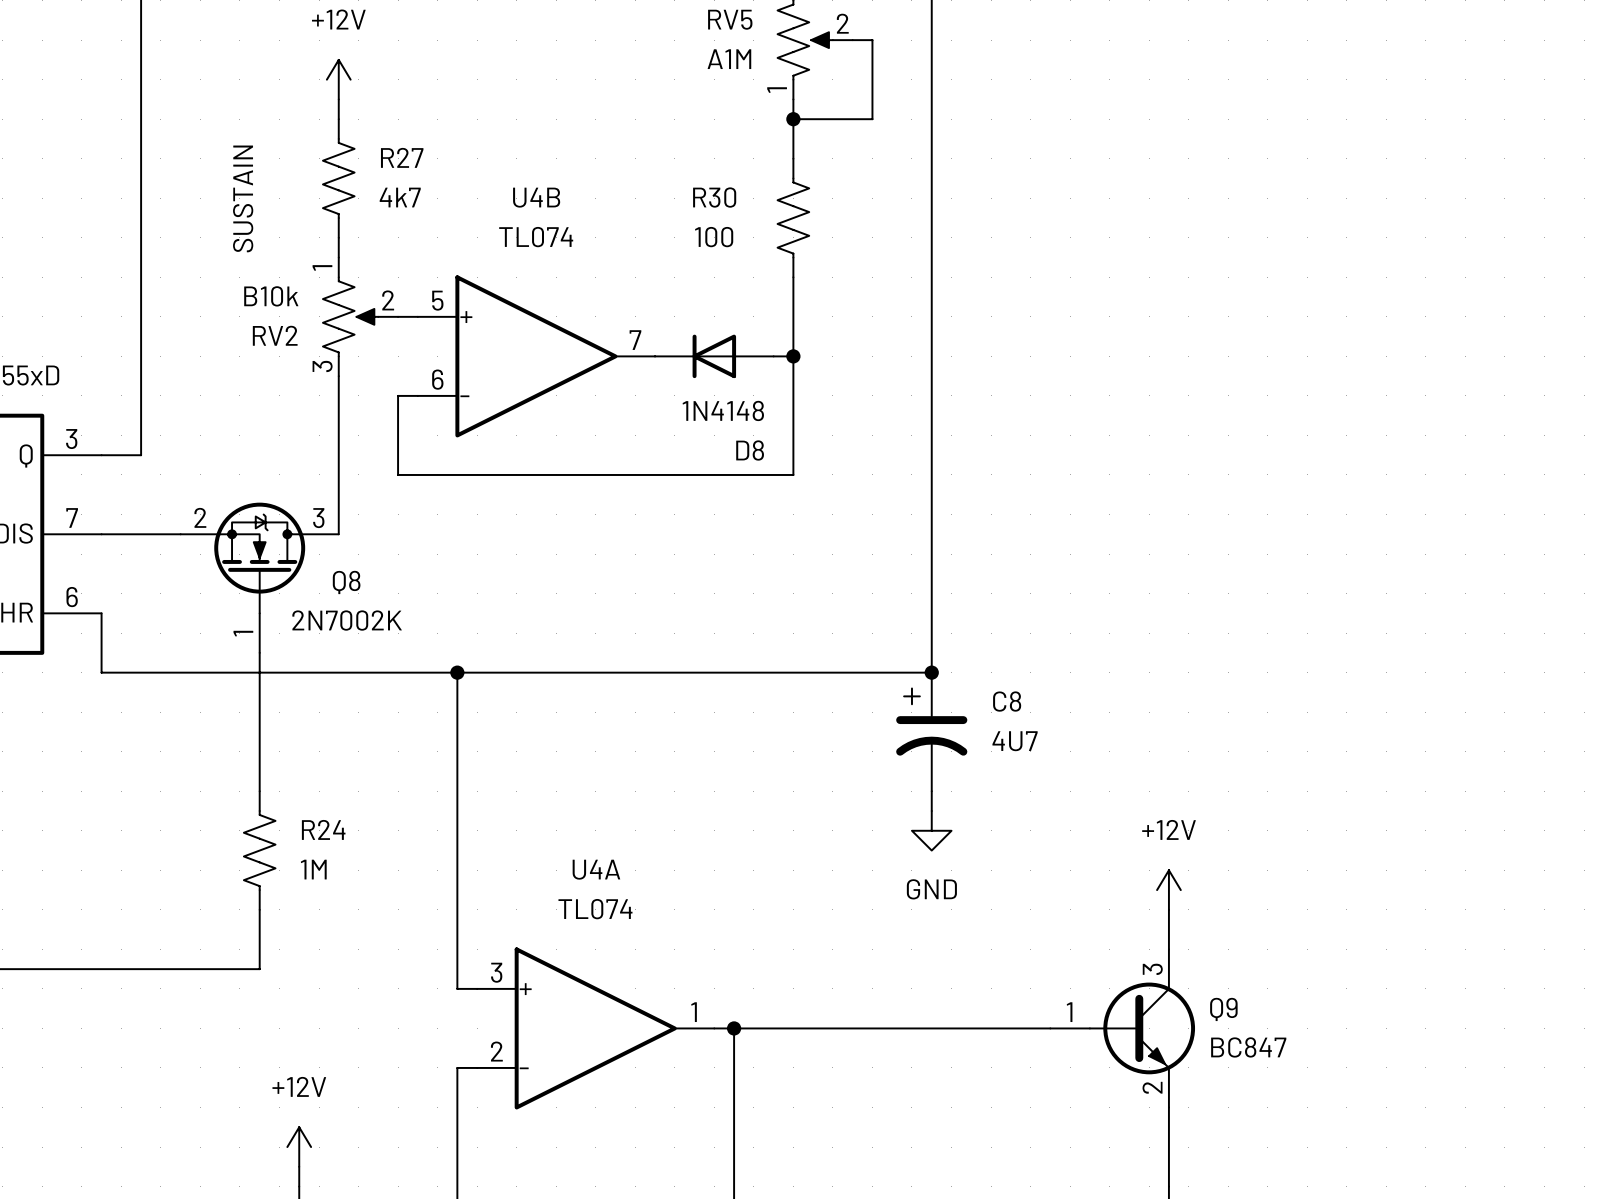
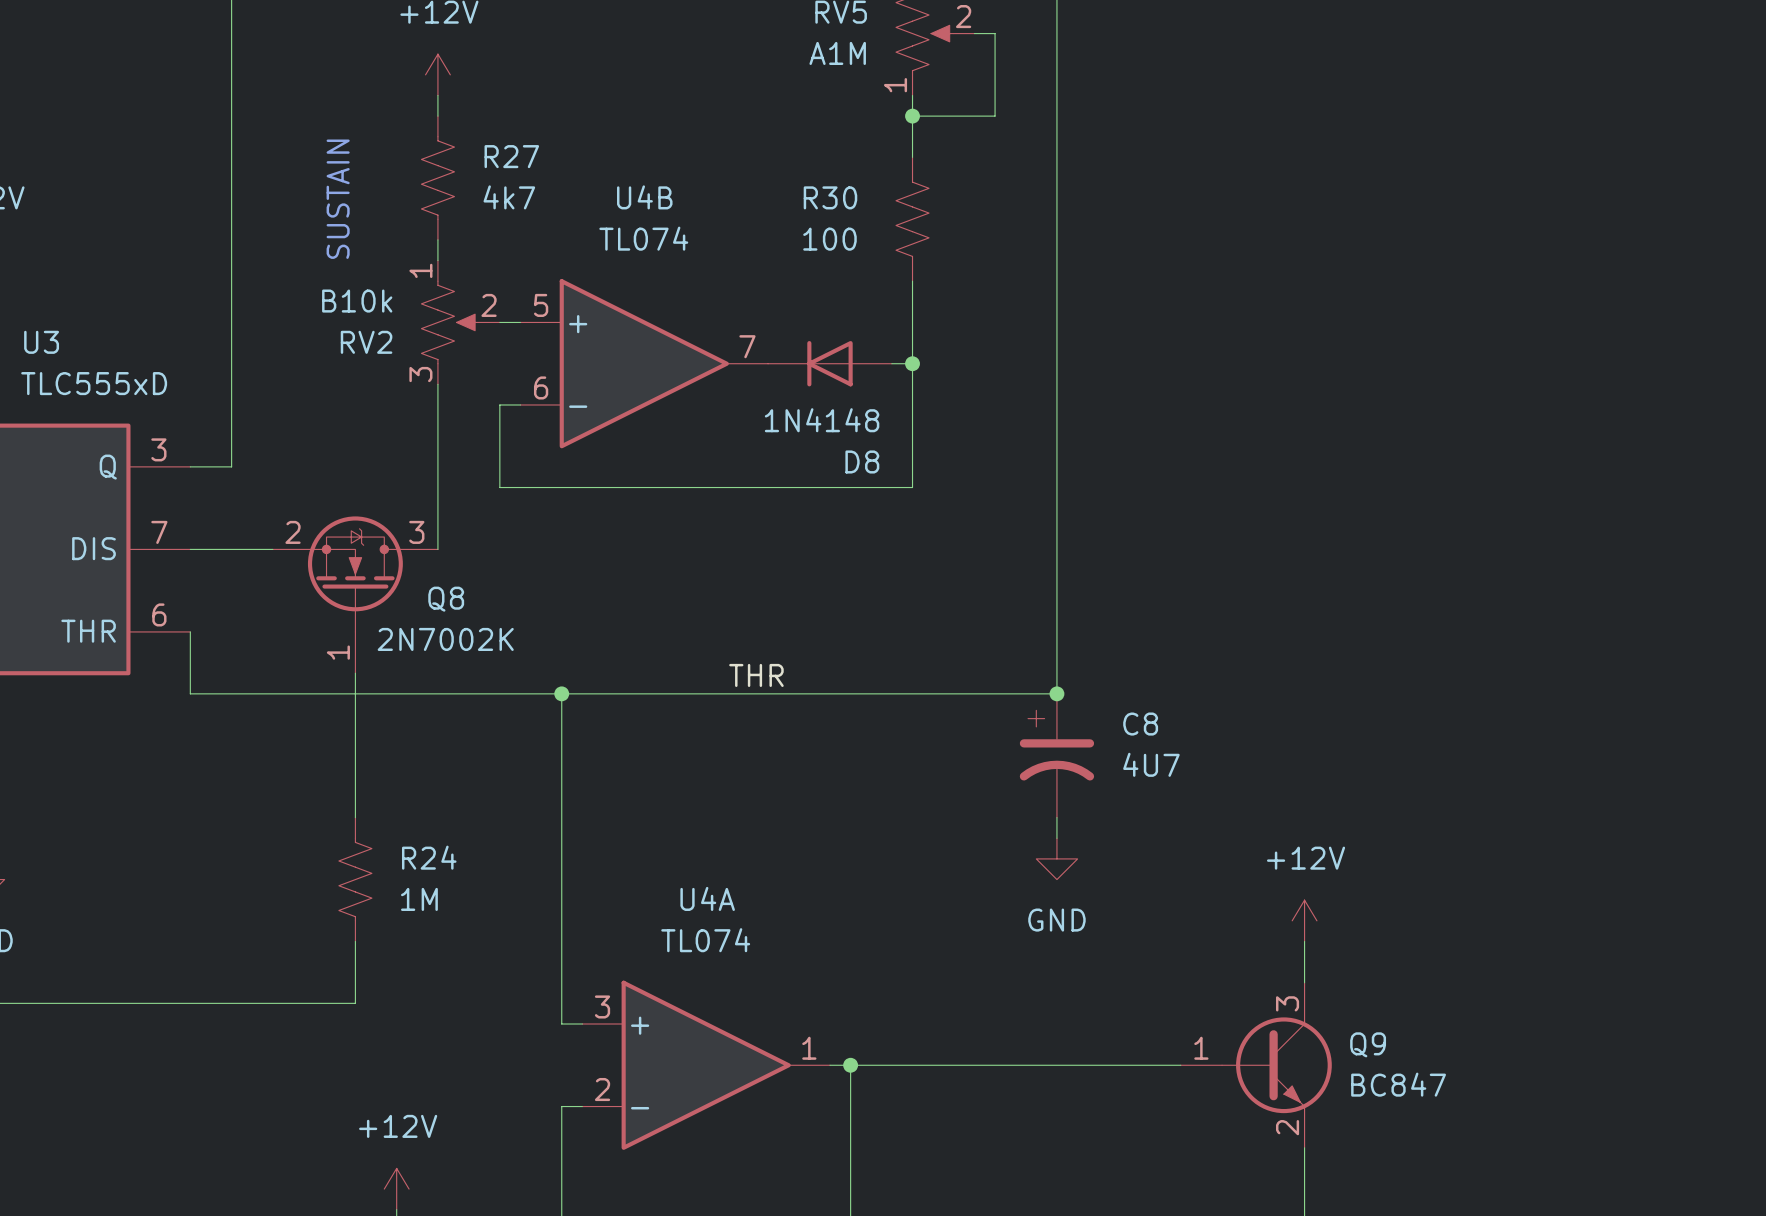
label: none -> THR (756, 675)

